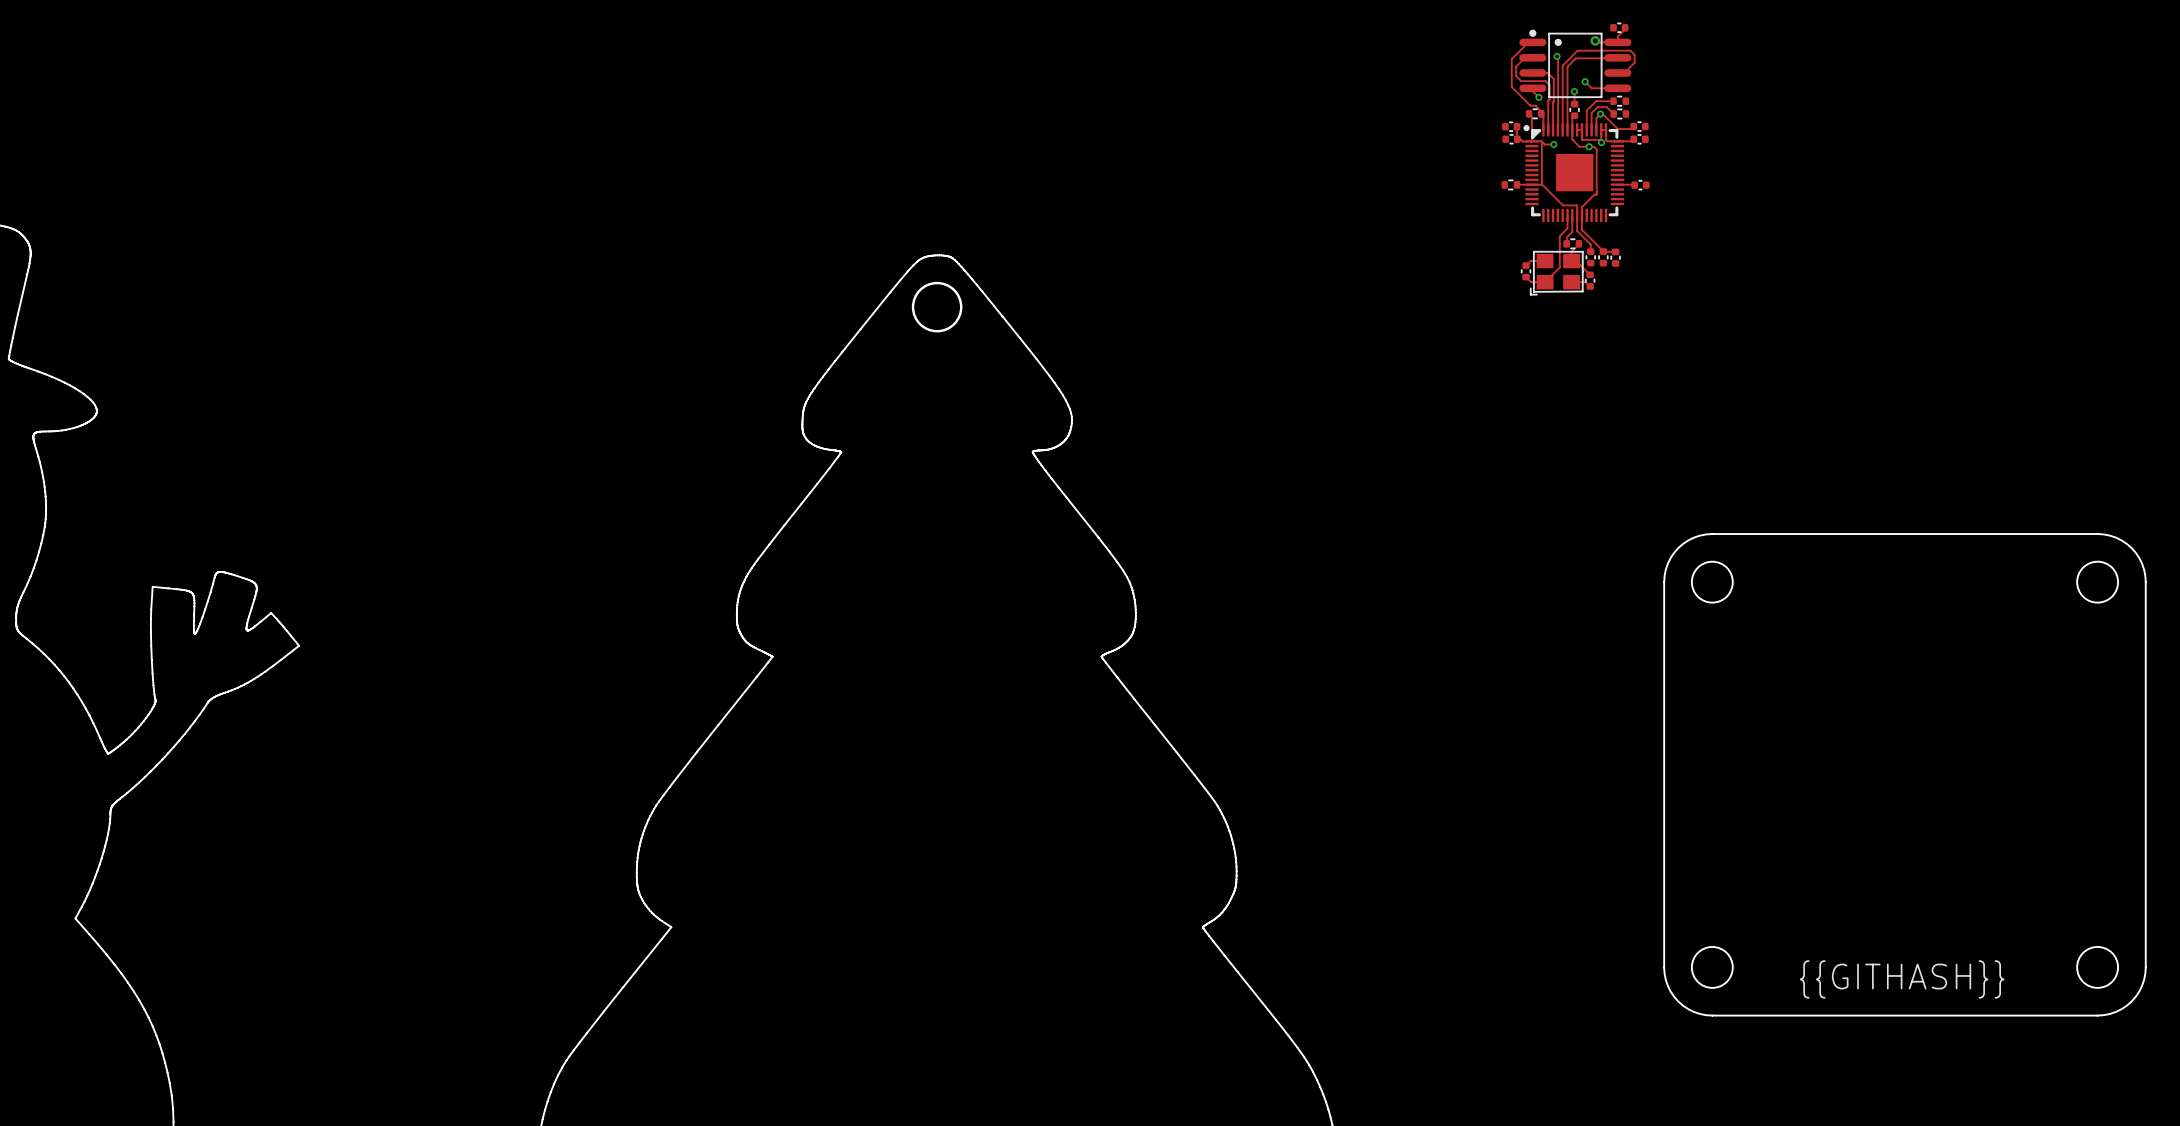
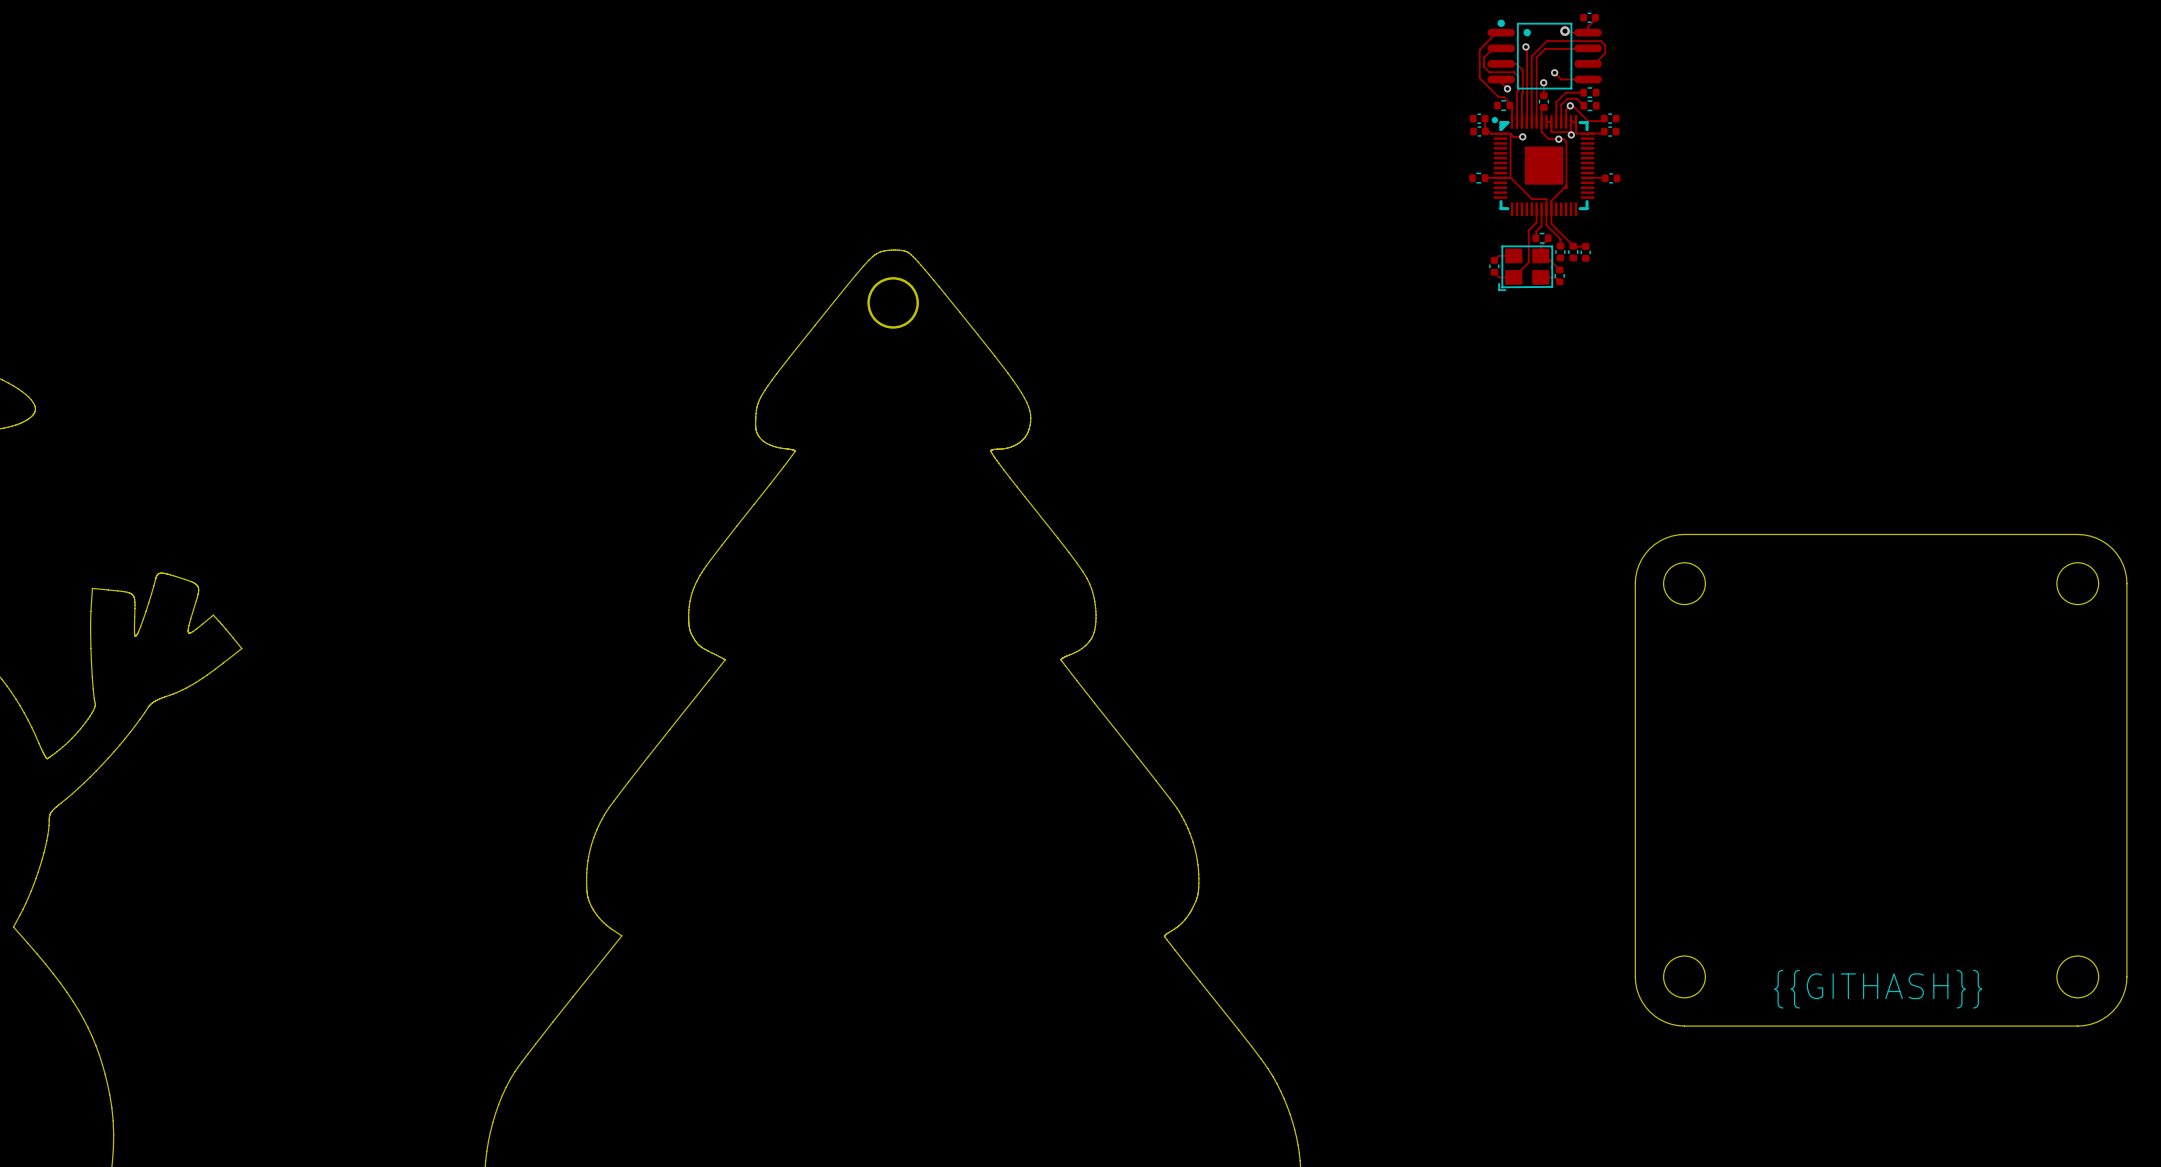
track: (1529, 113) (1531, 116) (1531, 141) -> none

